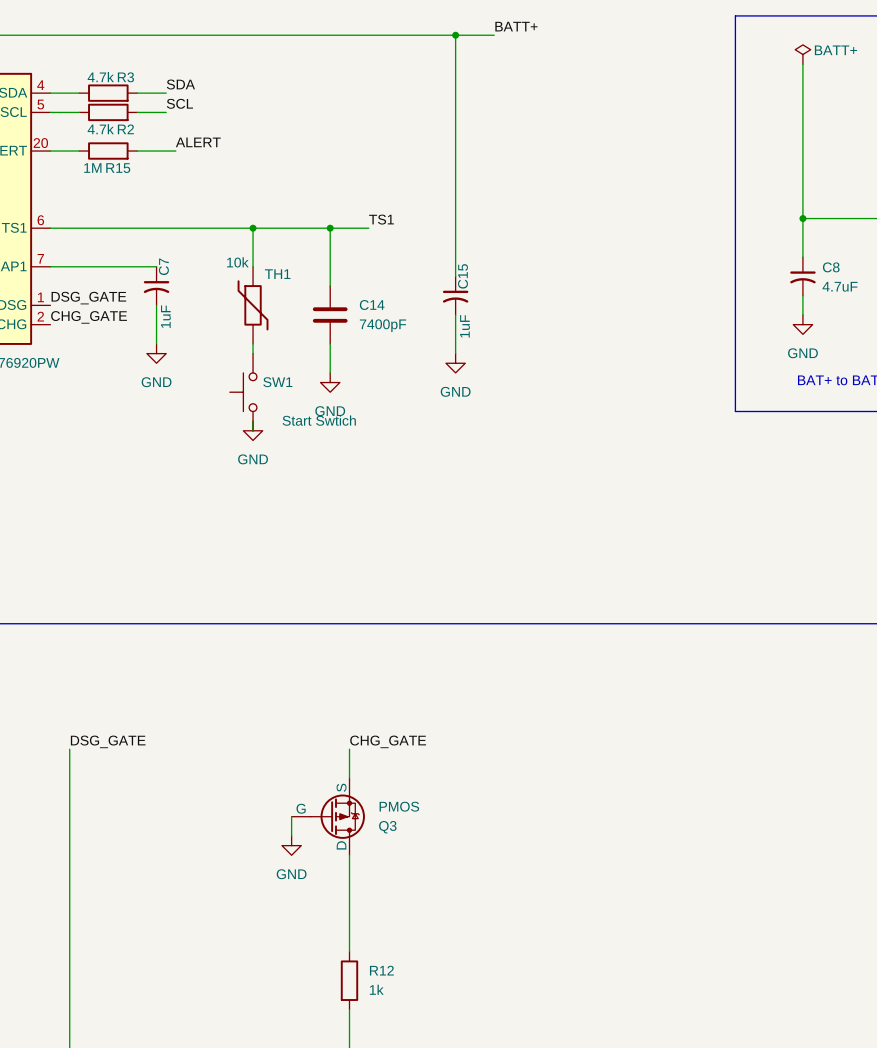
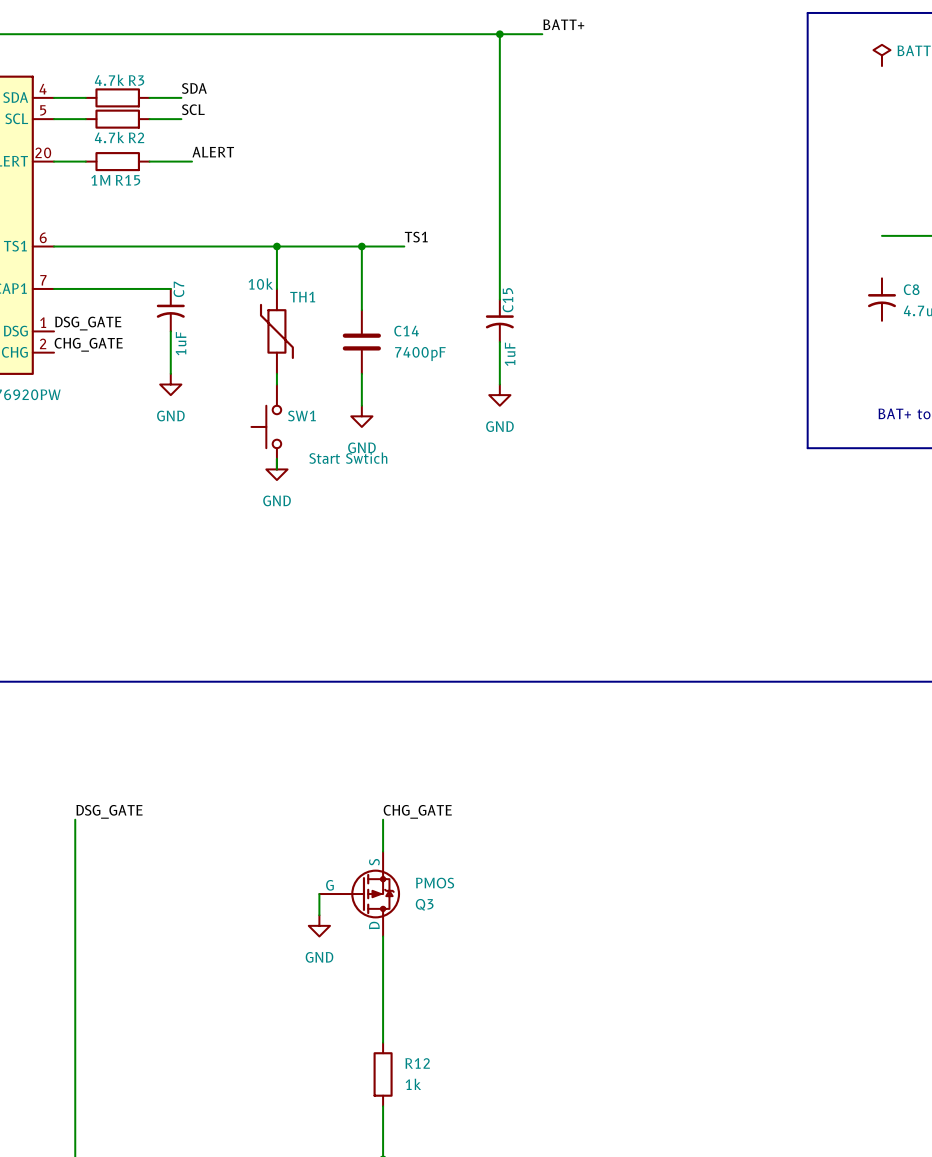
wire: (802, 64) (802, 257) -> none
junction: (802, 218) -> none
wire: (802, 295) (802, 315) -> none
power symbol: GND (802, 324) -> none

